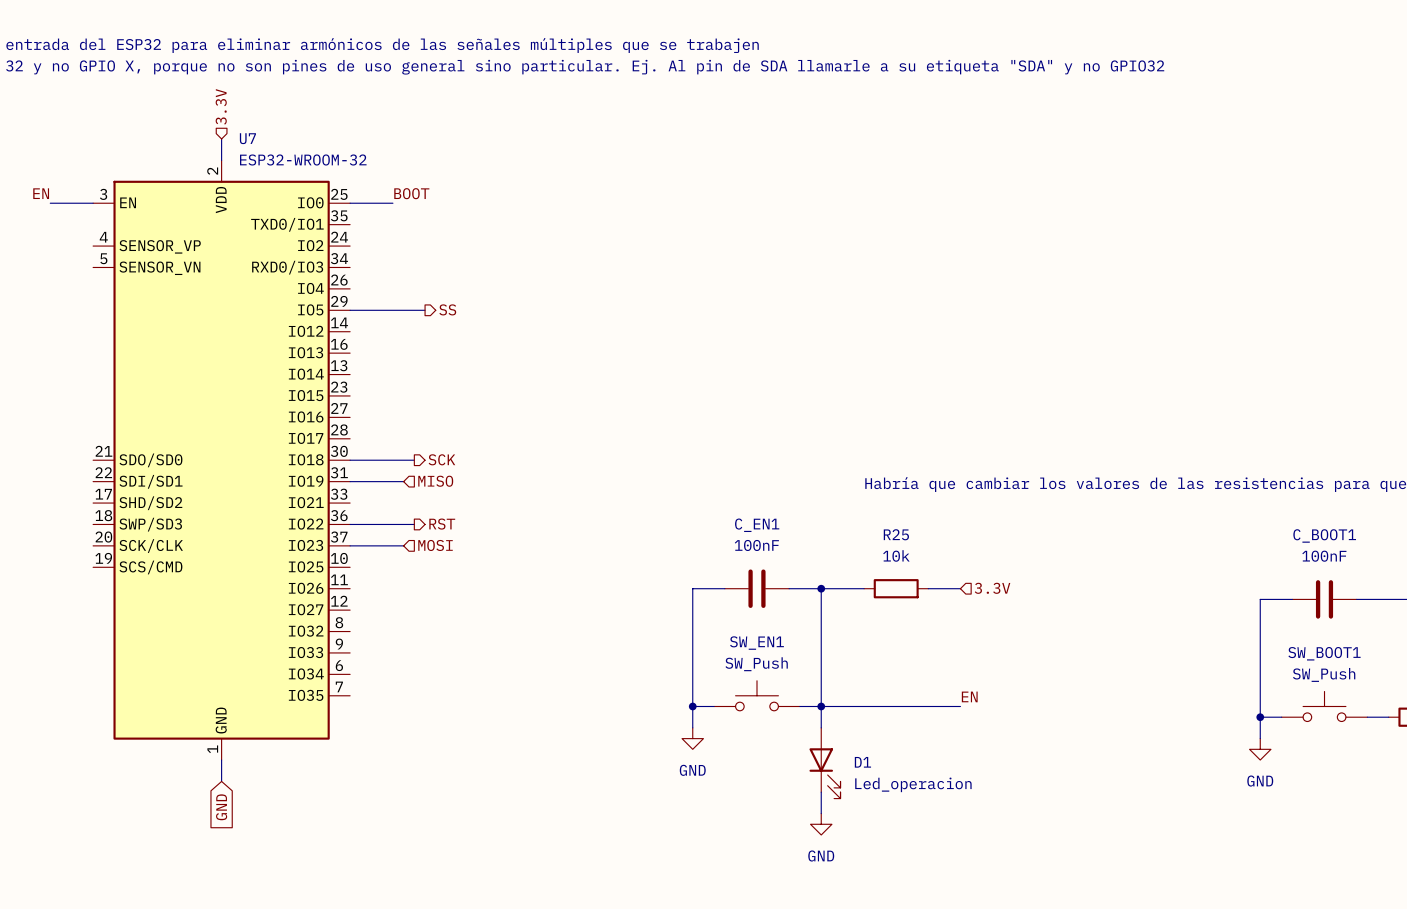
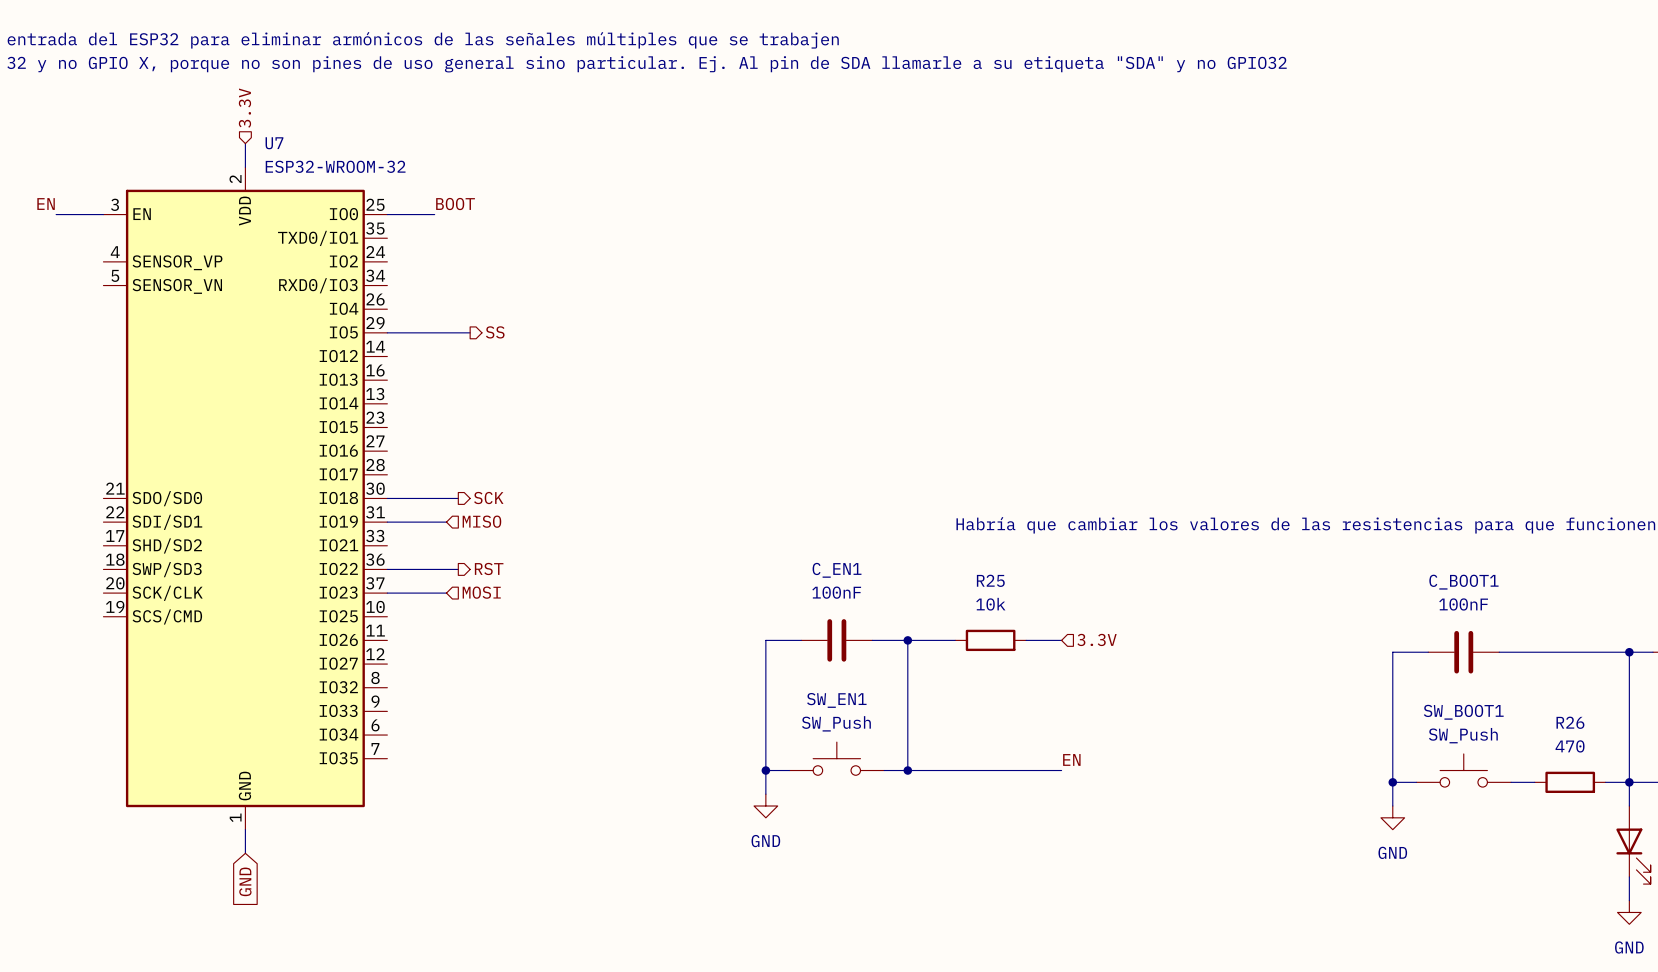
wire: (821, 706) (821, 727) -> none
D1: Led_operacion (824, 763) -> none
wire: (821, 792) (821, 813) -> none
power symbol: GND (821, 824) -> none

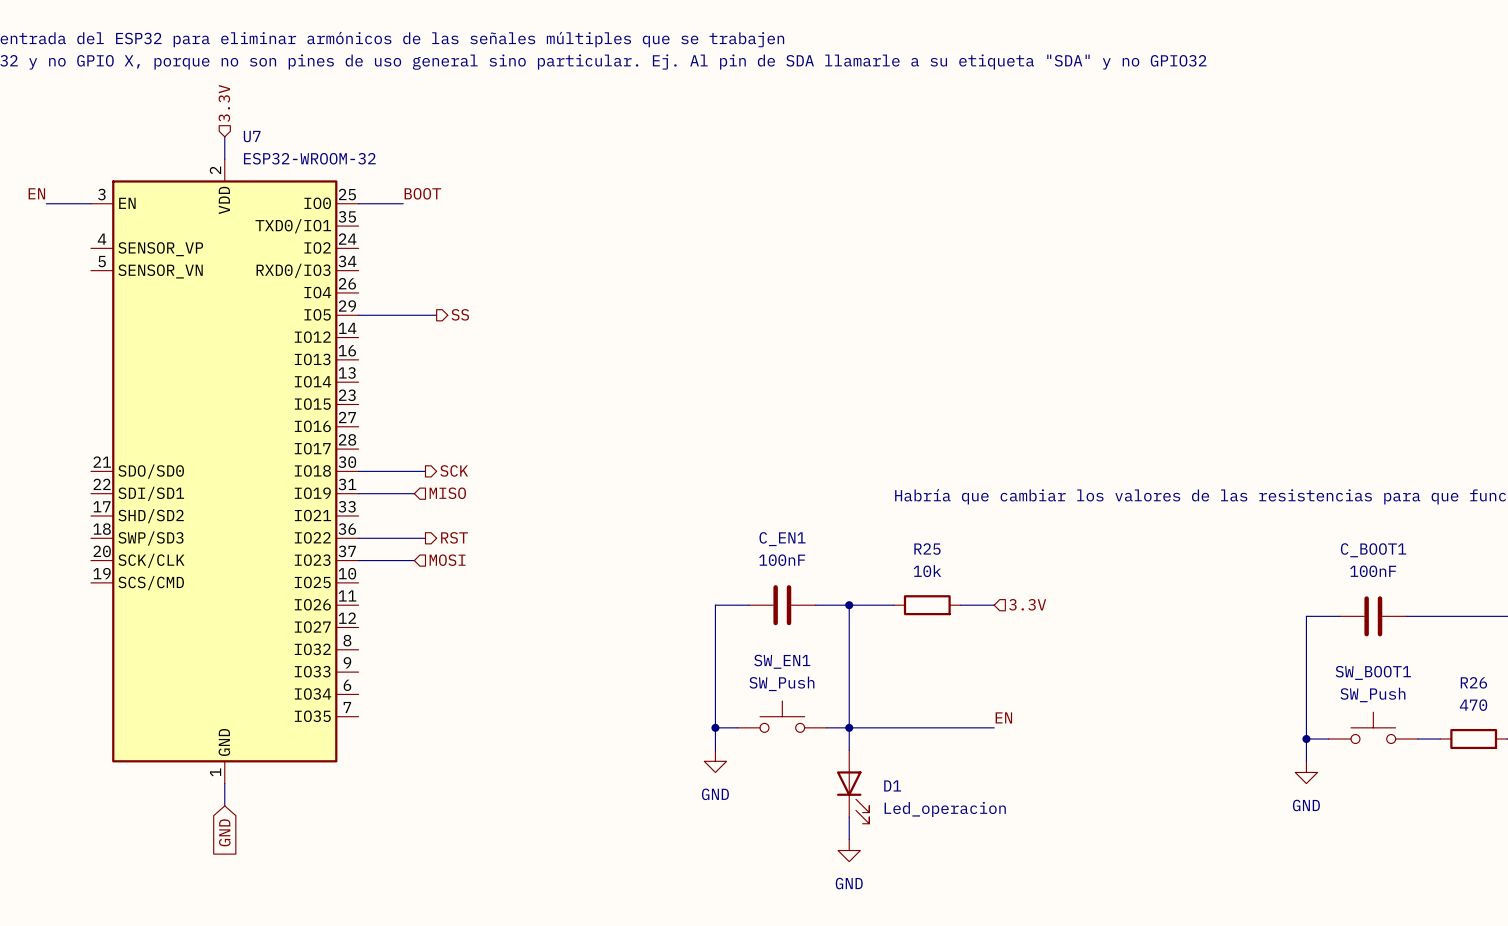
wire: none -> (849, 727) (849, 750)
D1: none -> Led_operacion (853, 786)
wire: none -> (849, 817) (849, 839)
power symbol: none -> GND (849, 850)

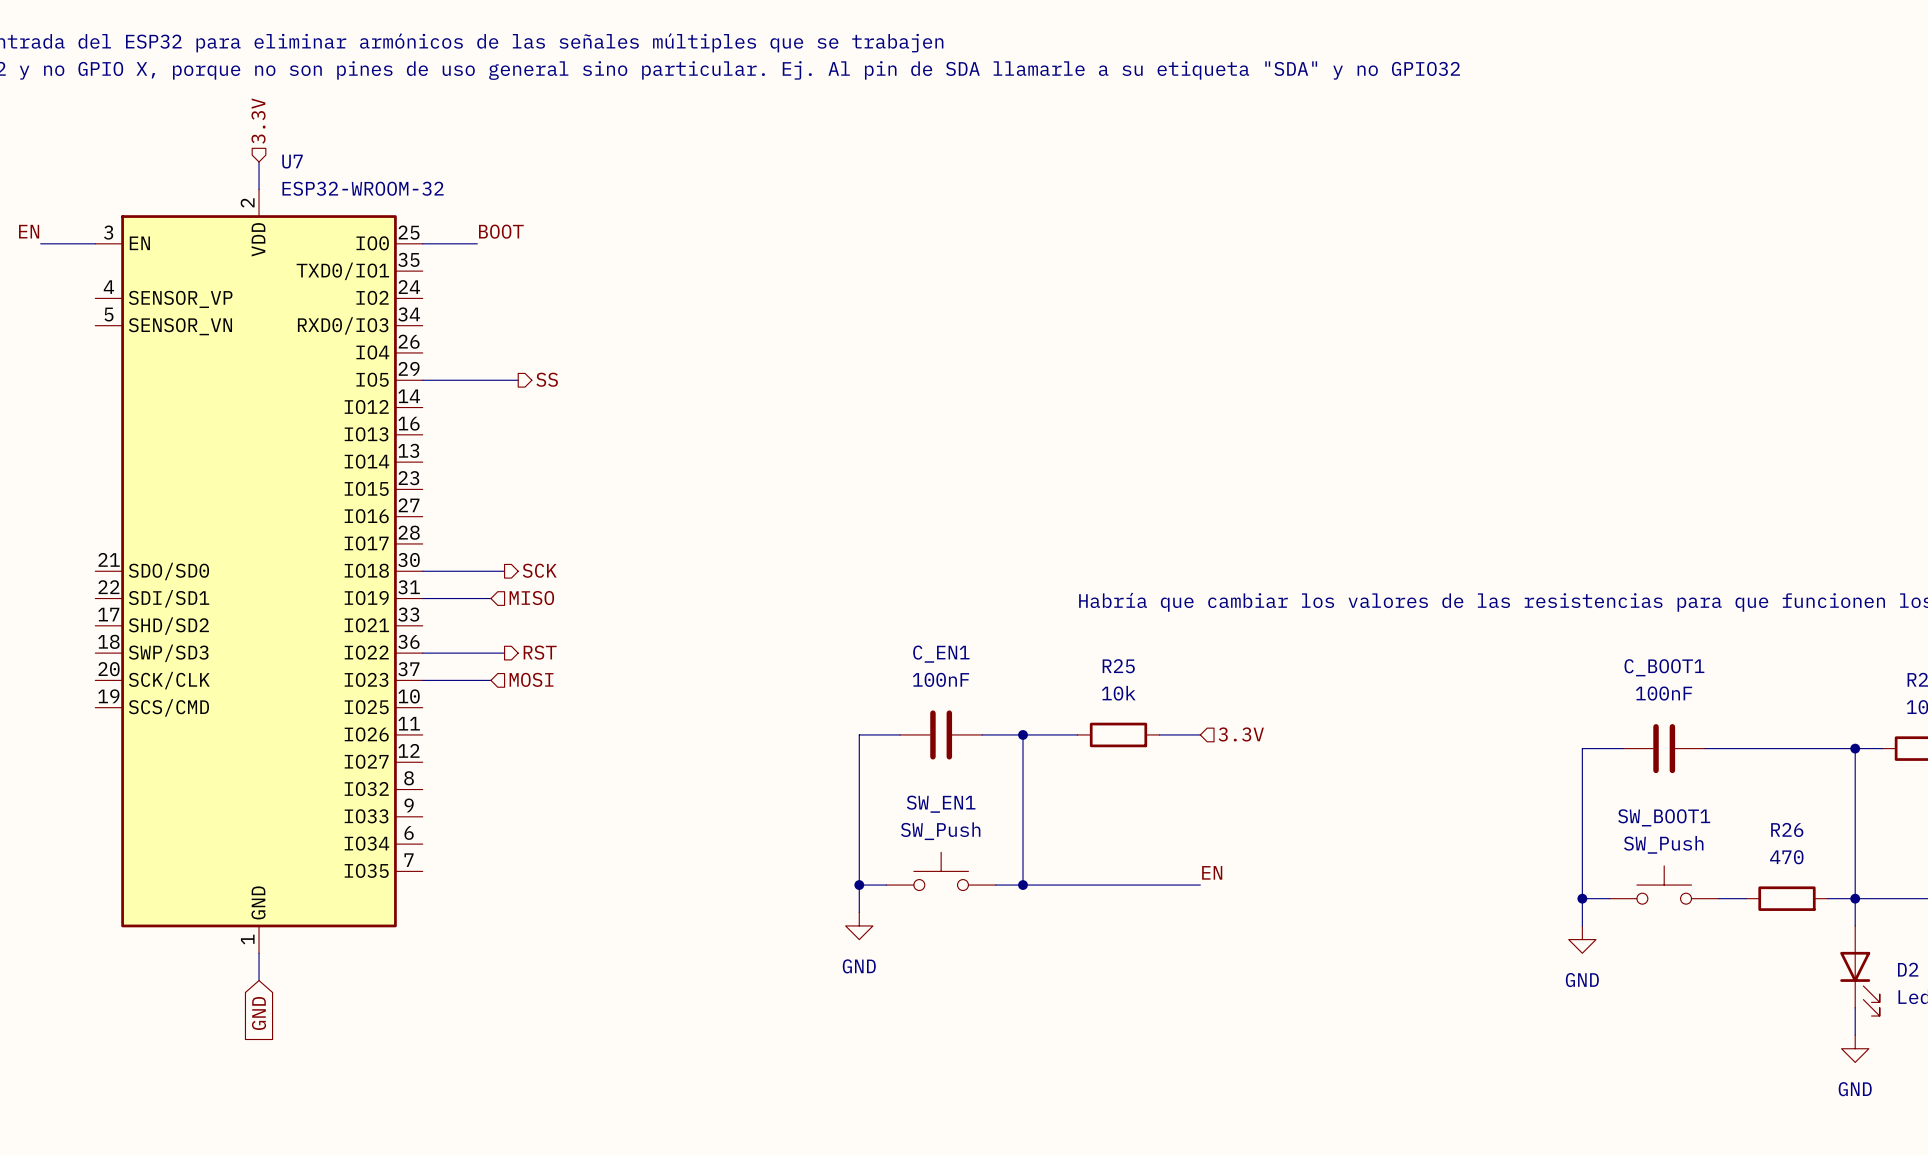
wire: (849, 727) (849, 750) -> none
D1: Led_operacion (853, 786) -> none
wire: (849, 817) (849, 839) -> none
power symbol: GND (849, 850) -> none

